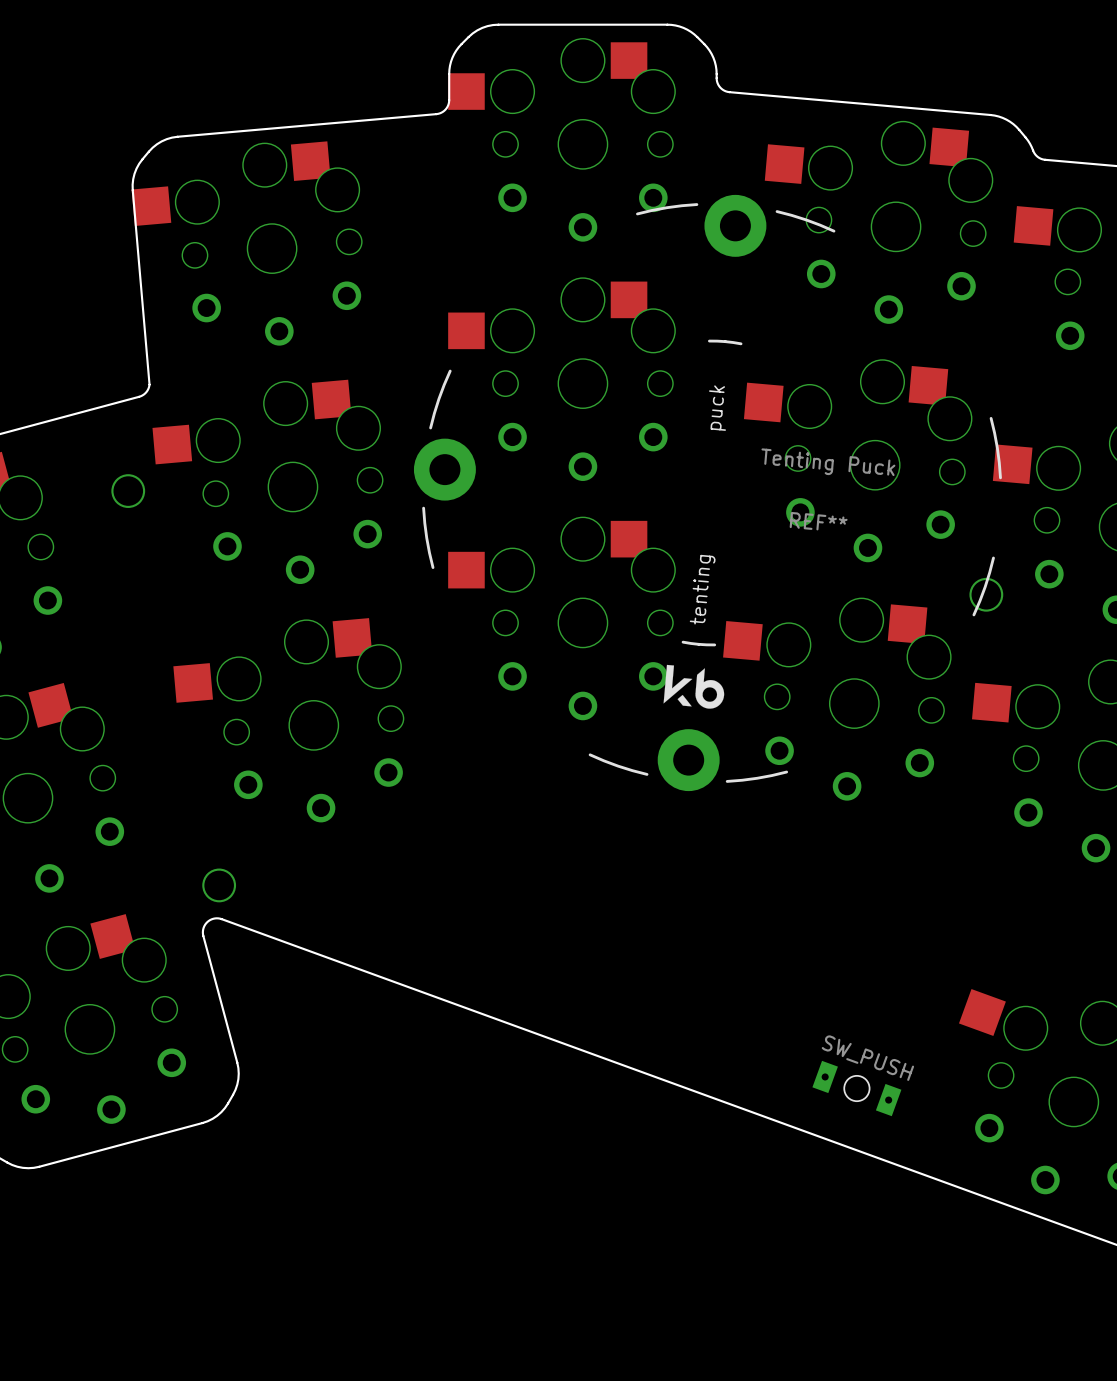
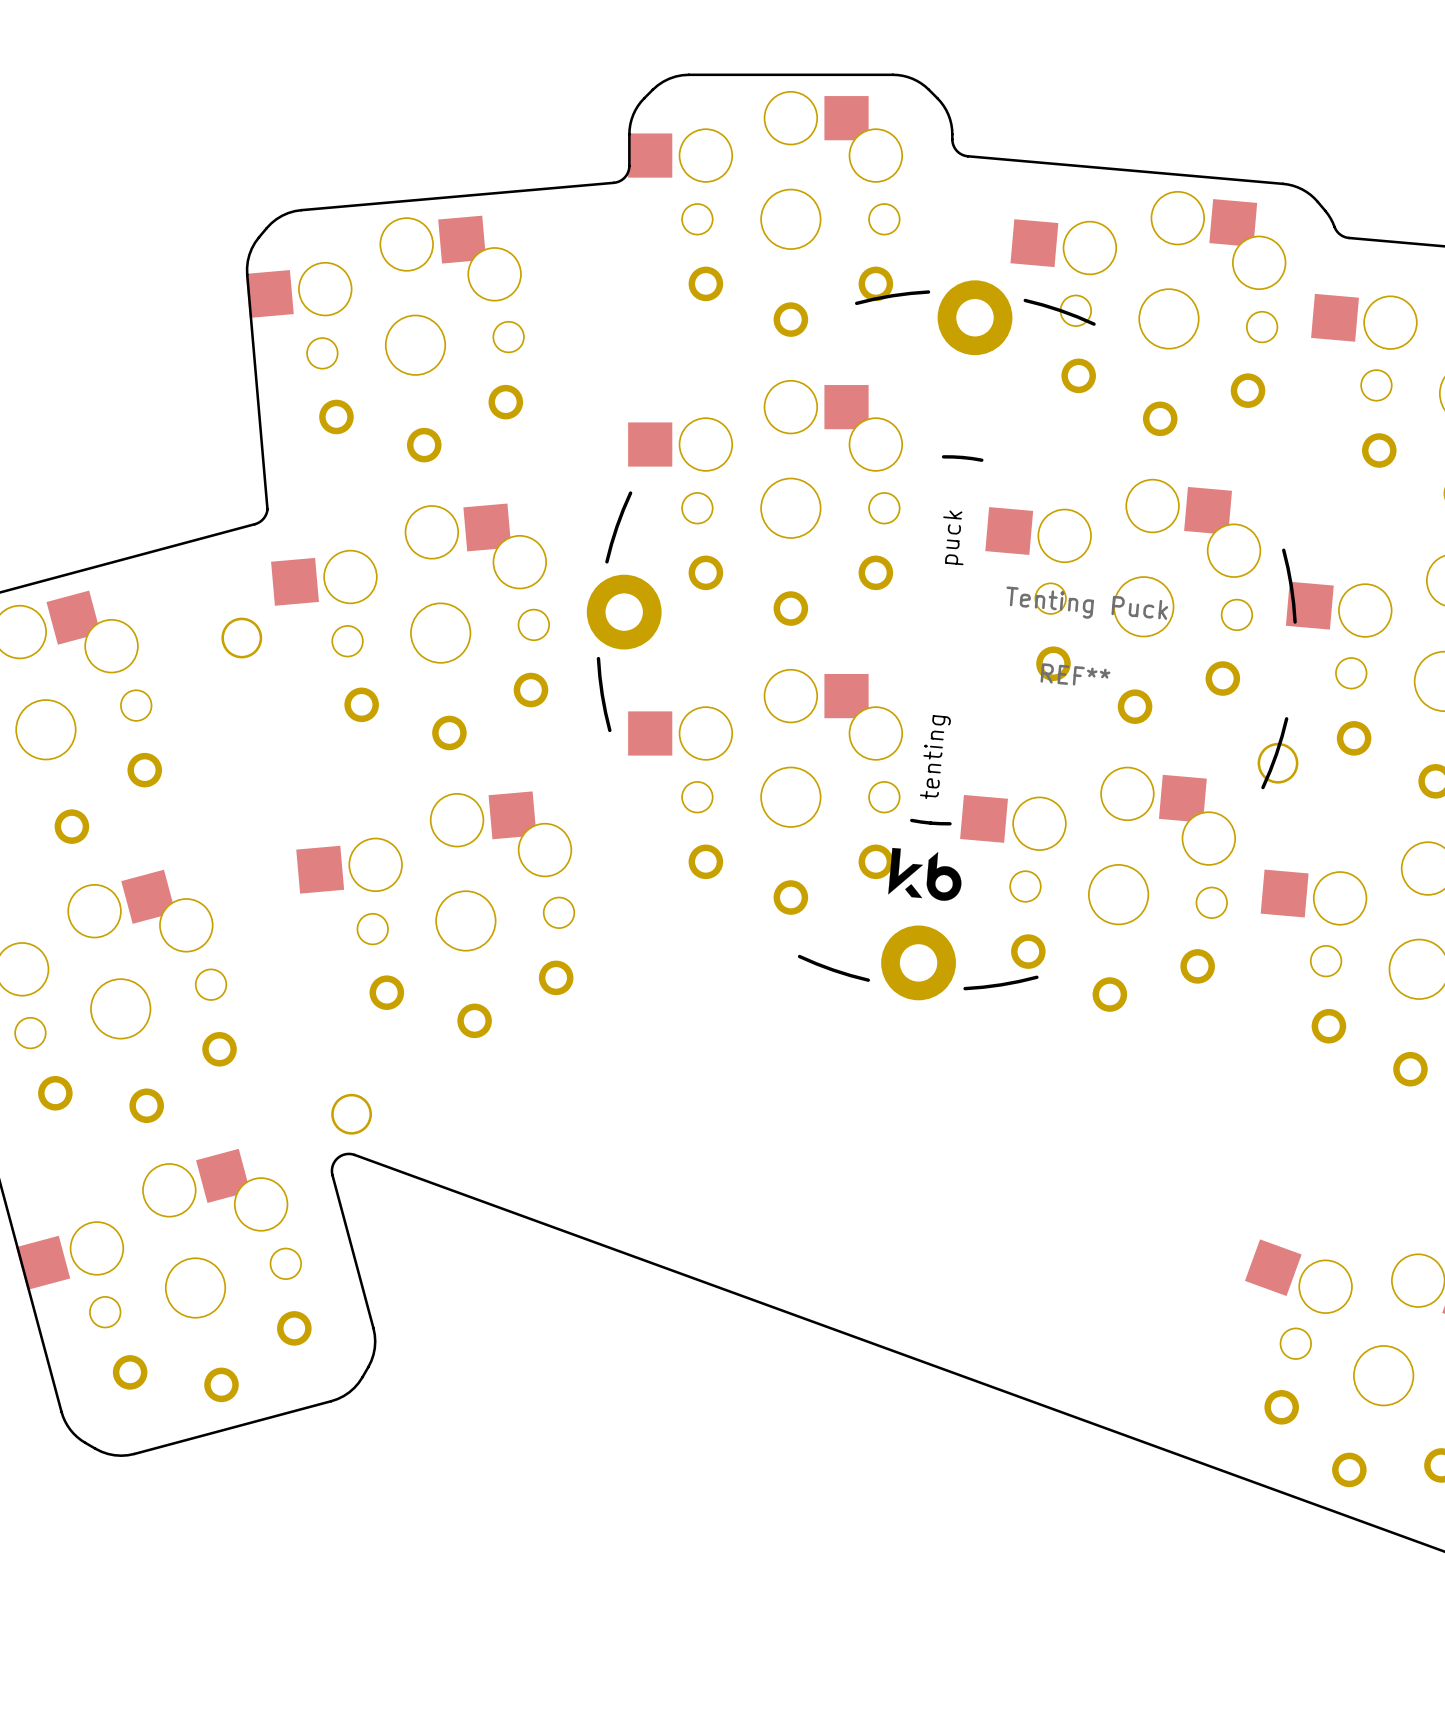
part: SW_PUSH (856, 1088) -> none

